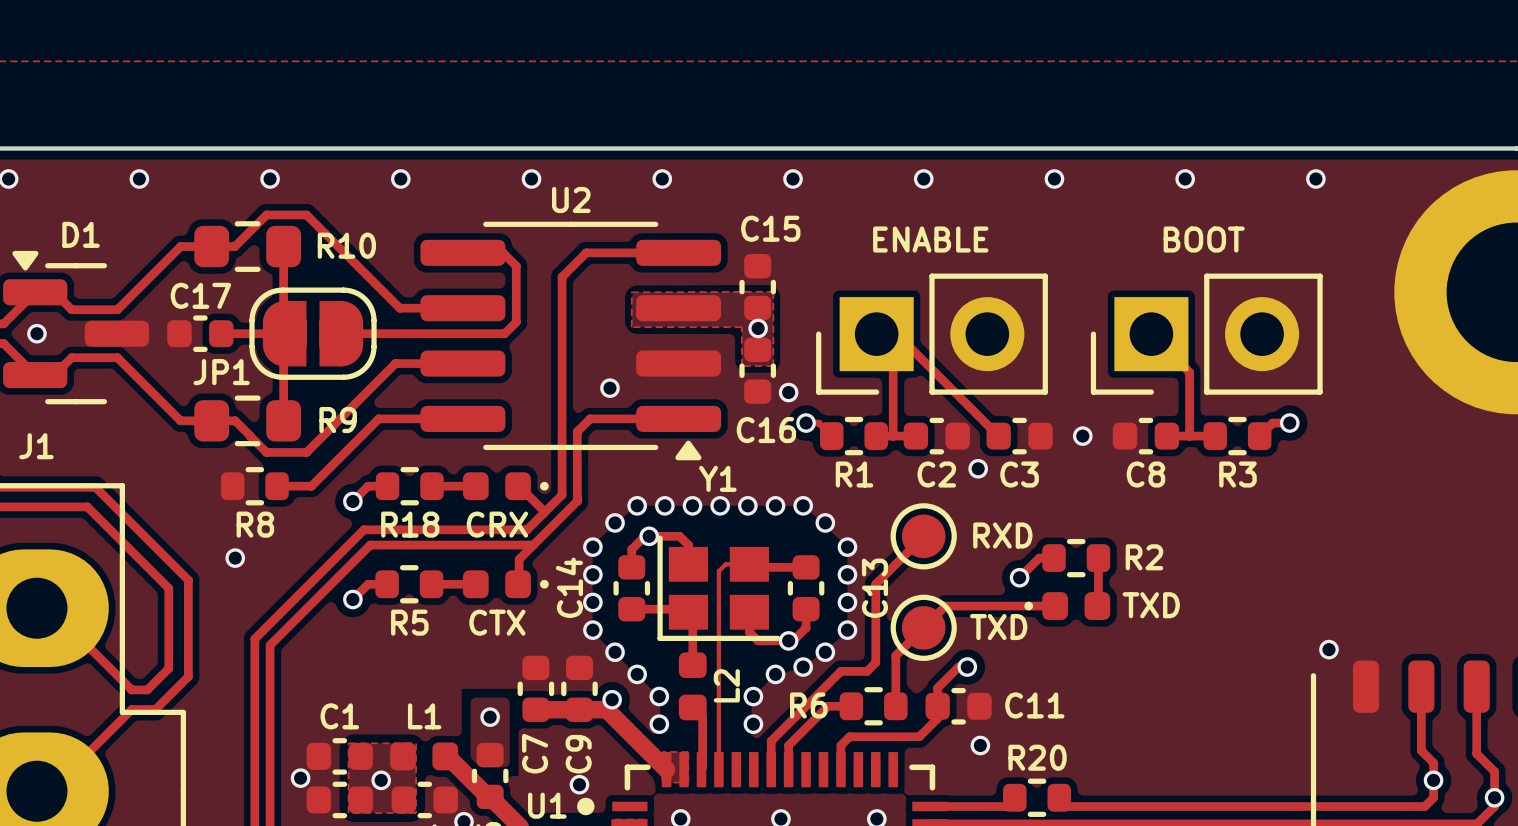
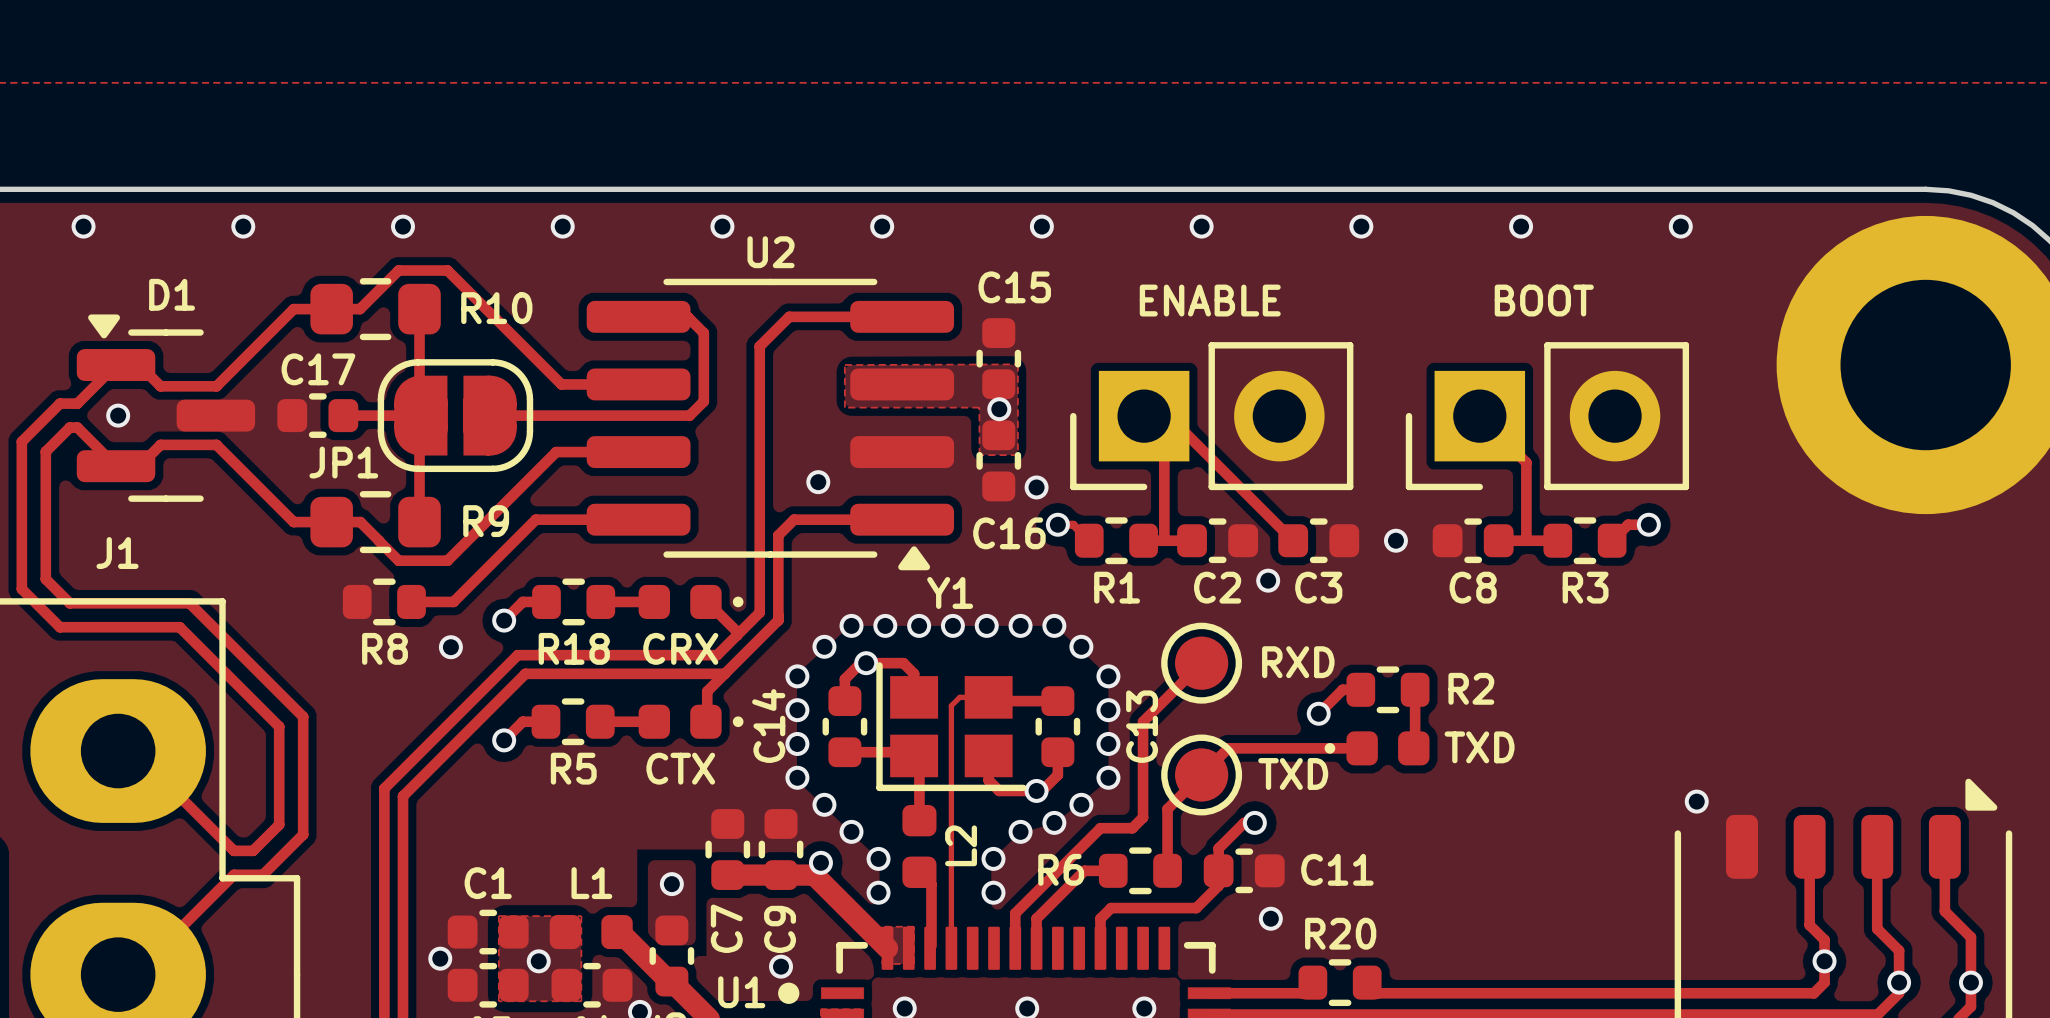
via position: (235, 558) -> (450, 647)

